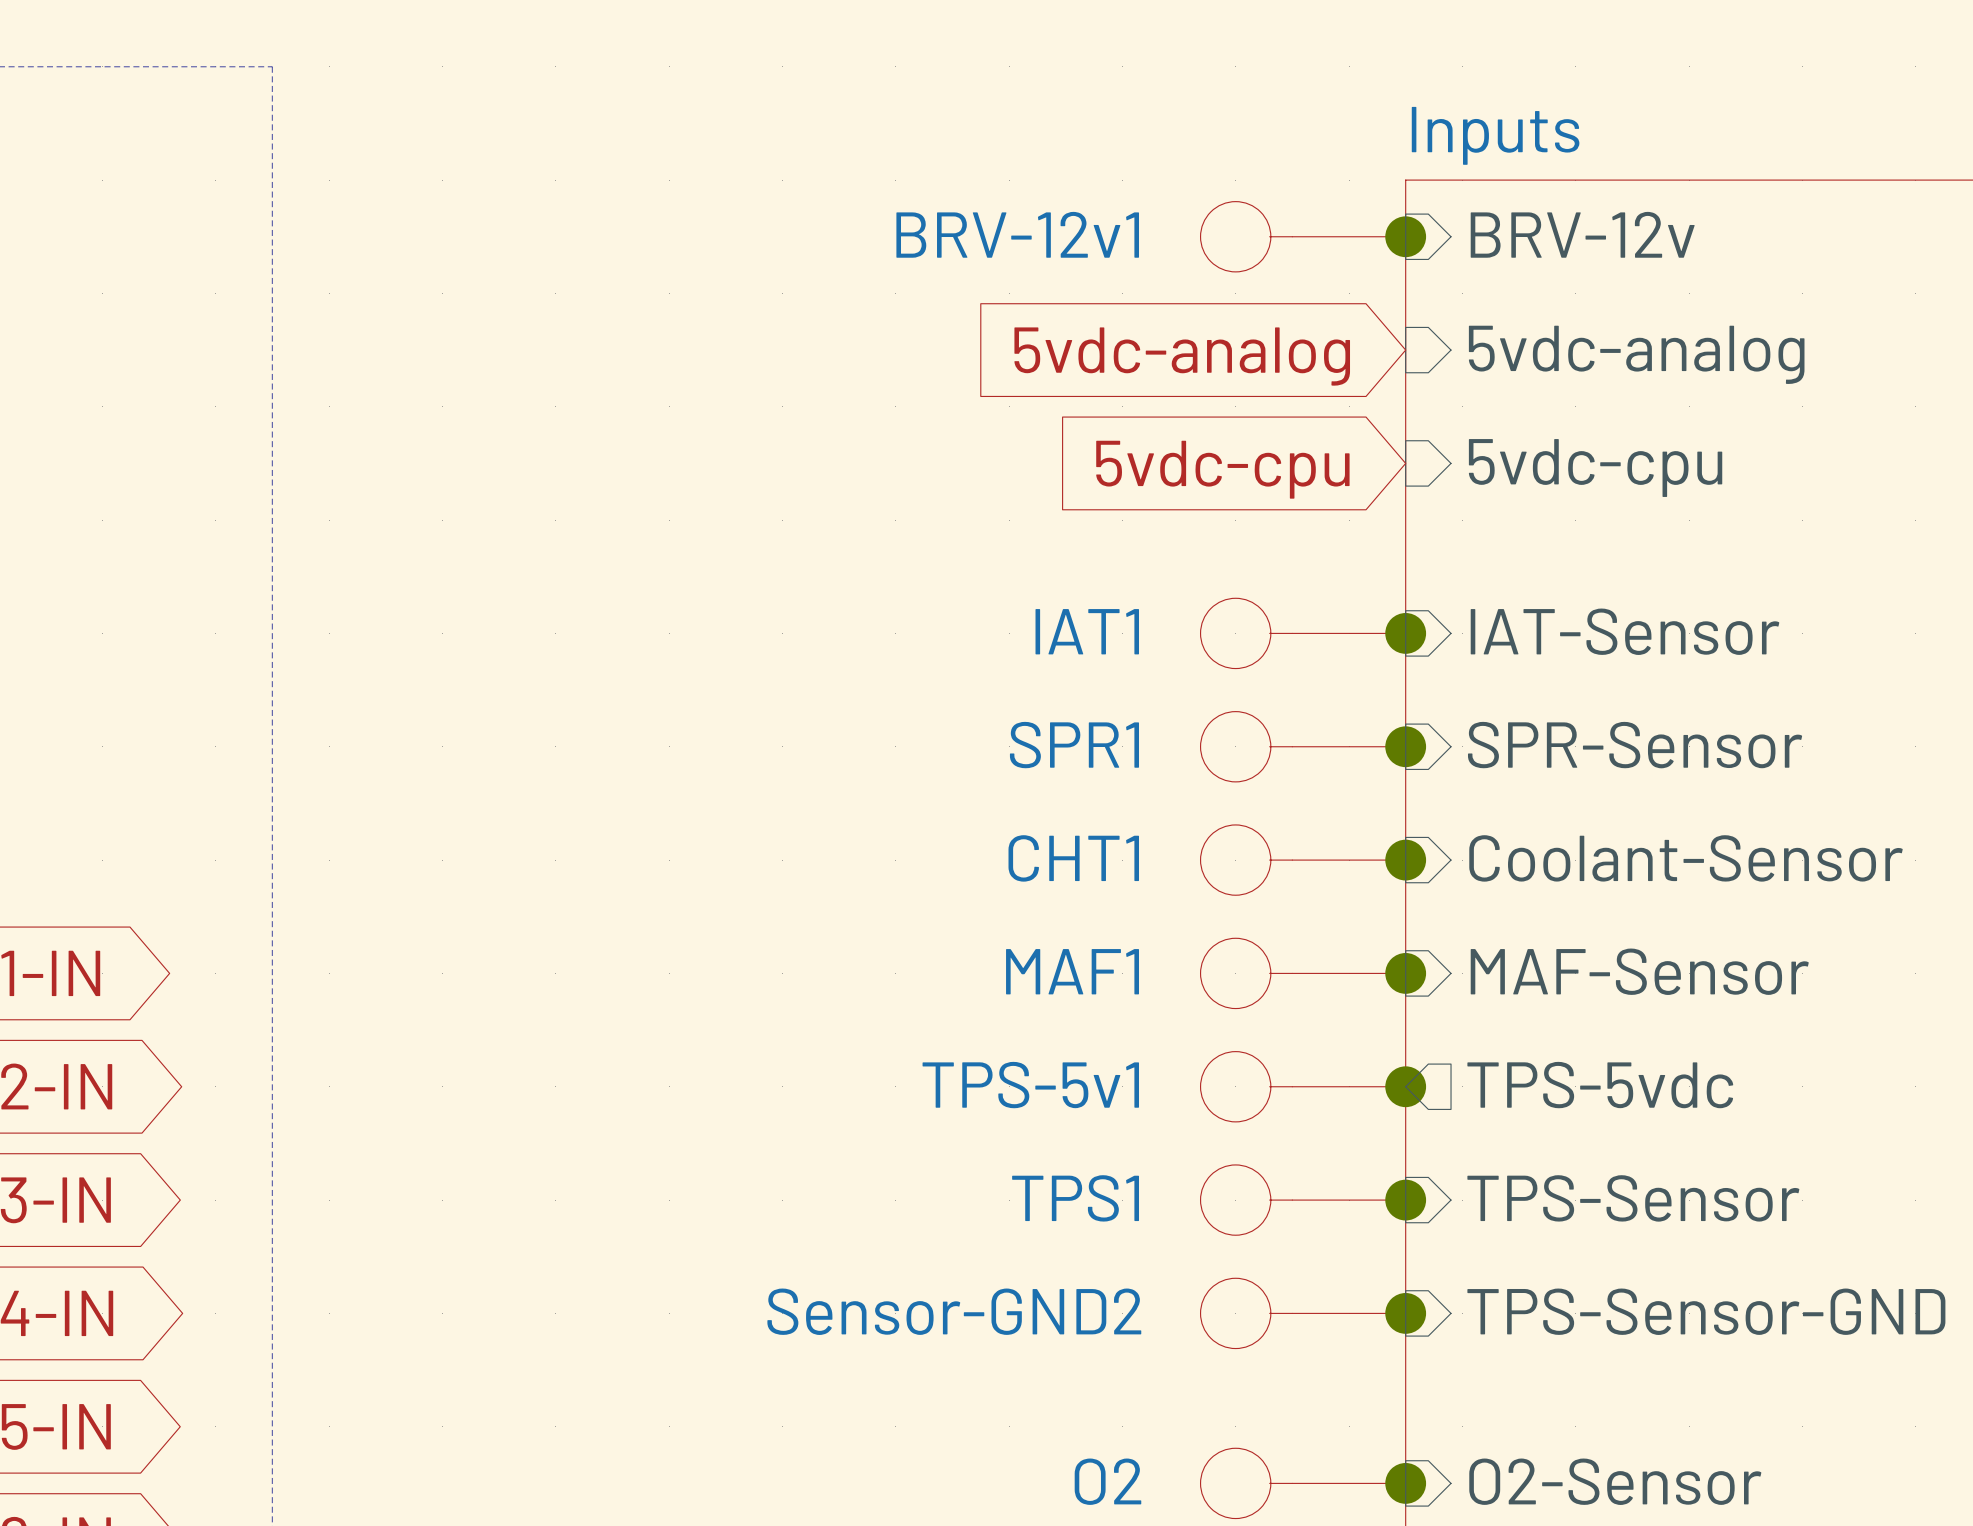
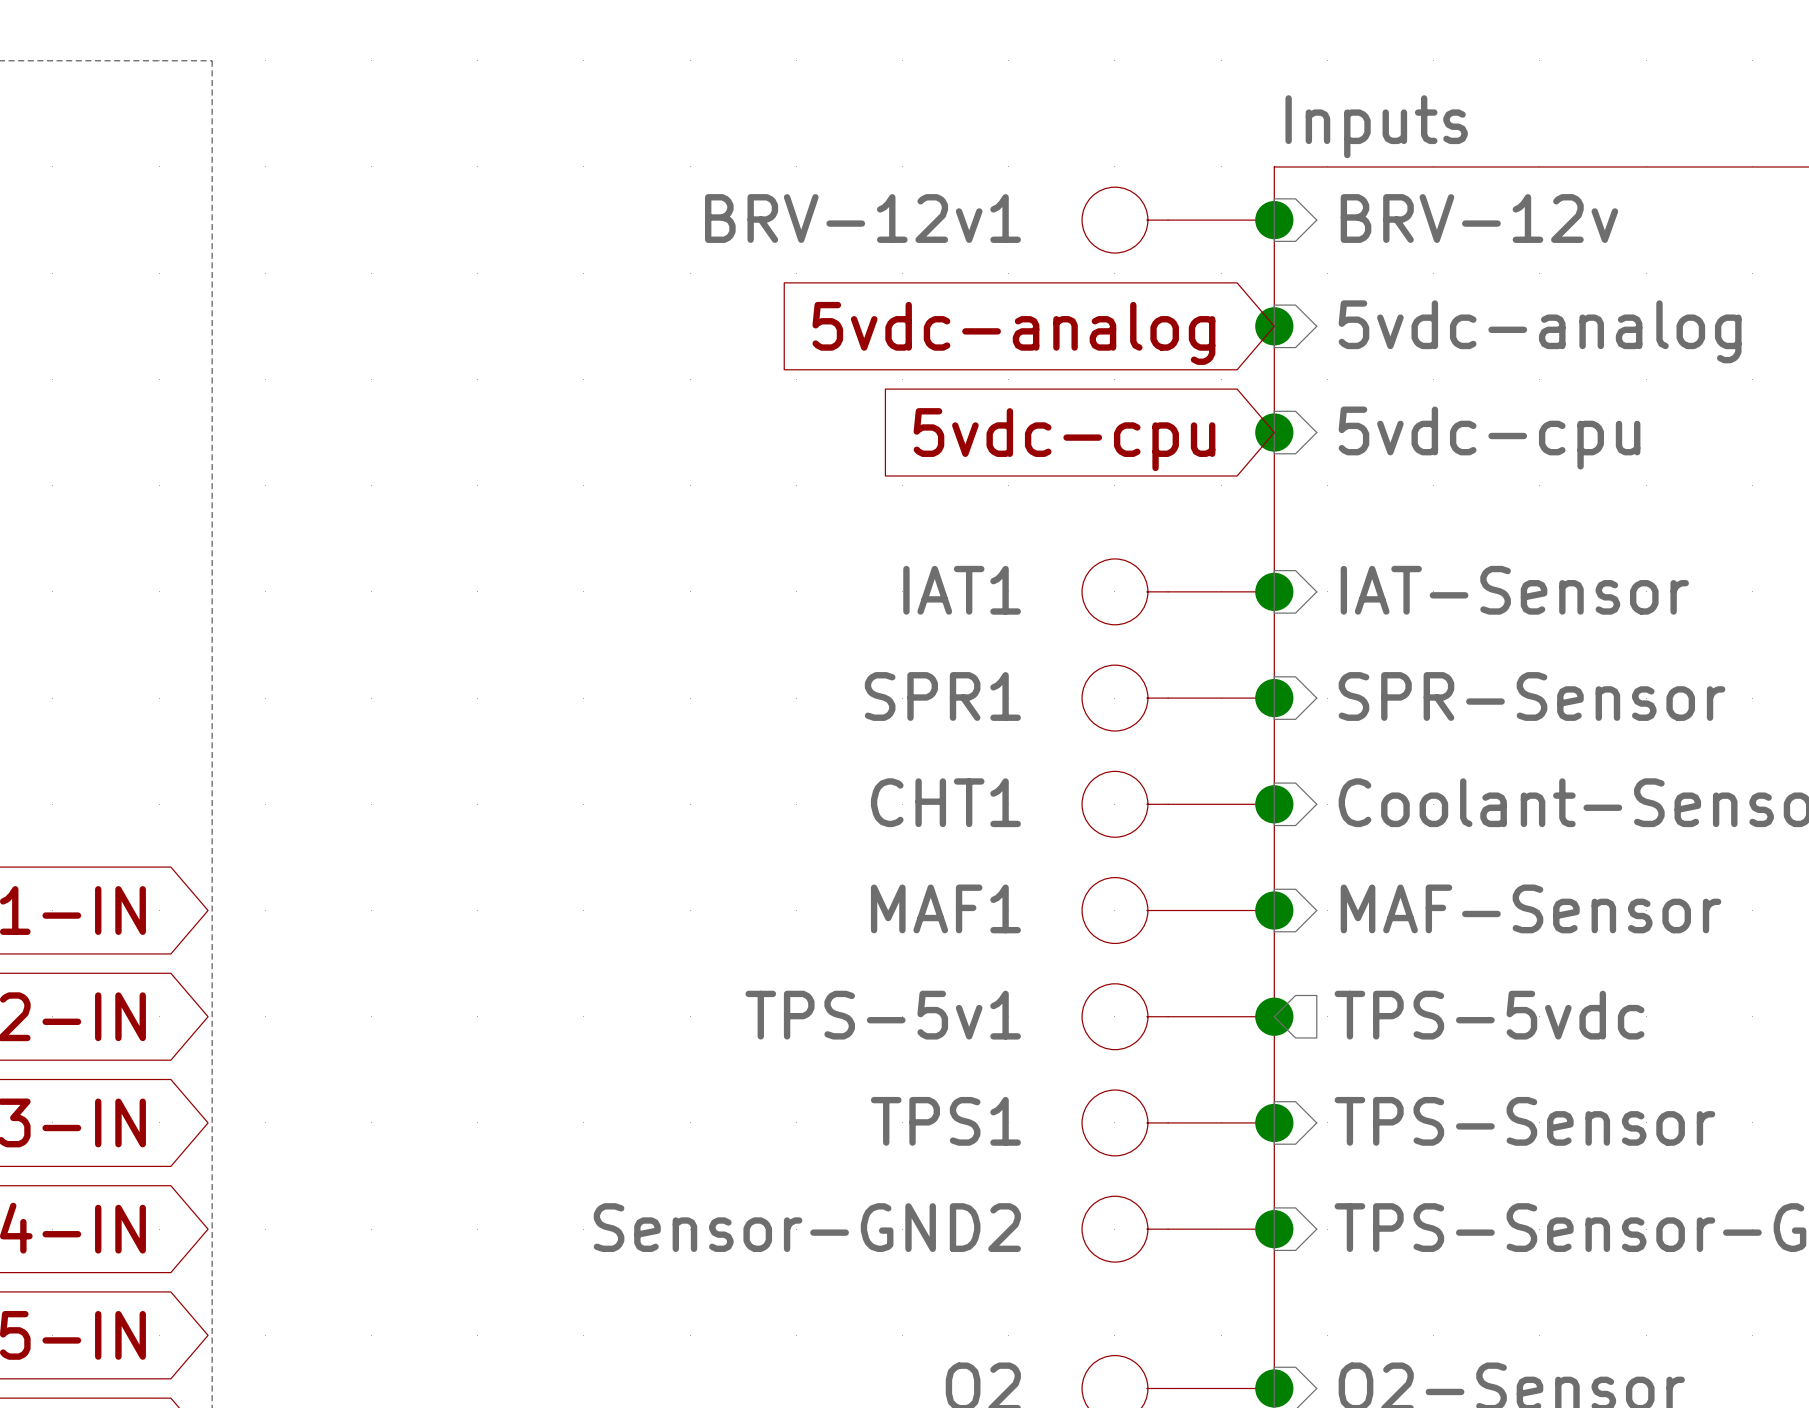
junction: none -> (1274, 326)
junction: none -> (1274, 432)

